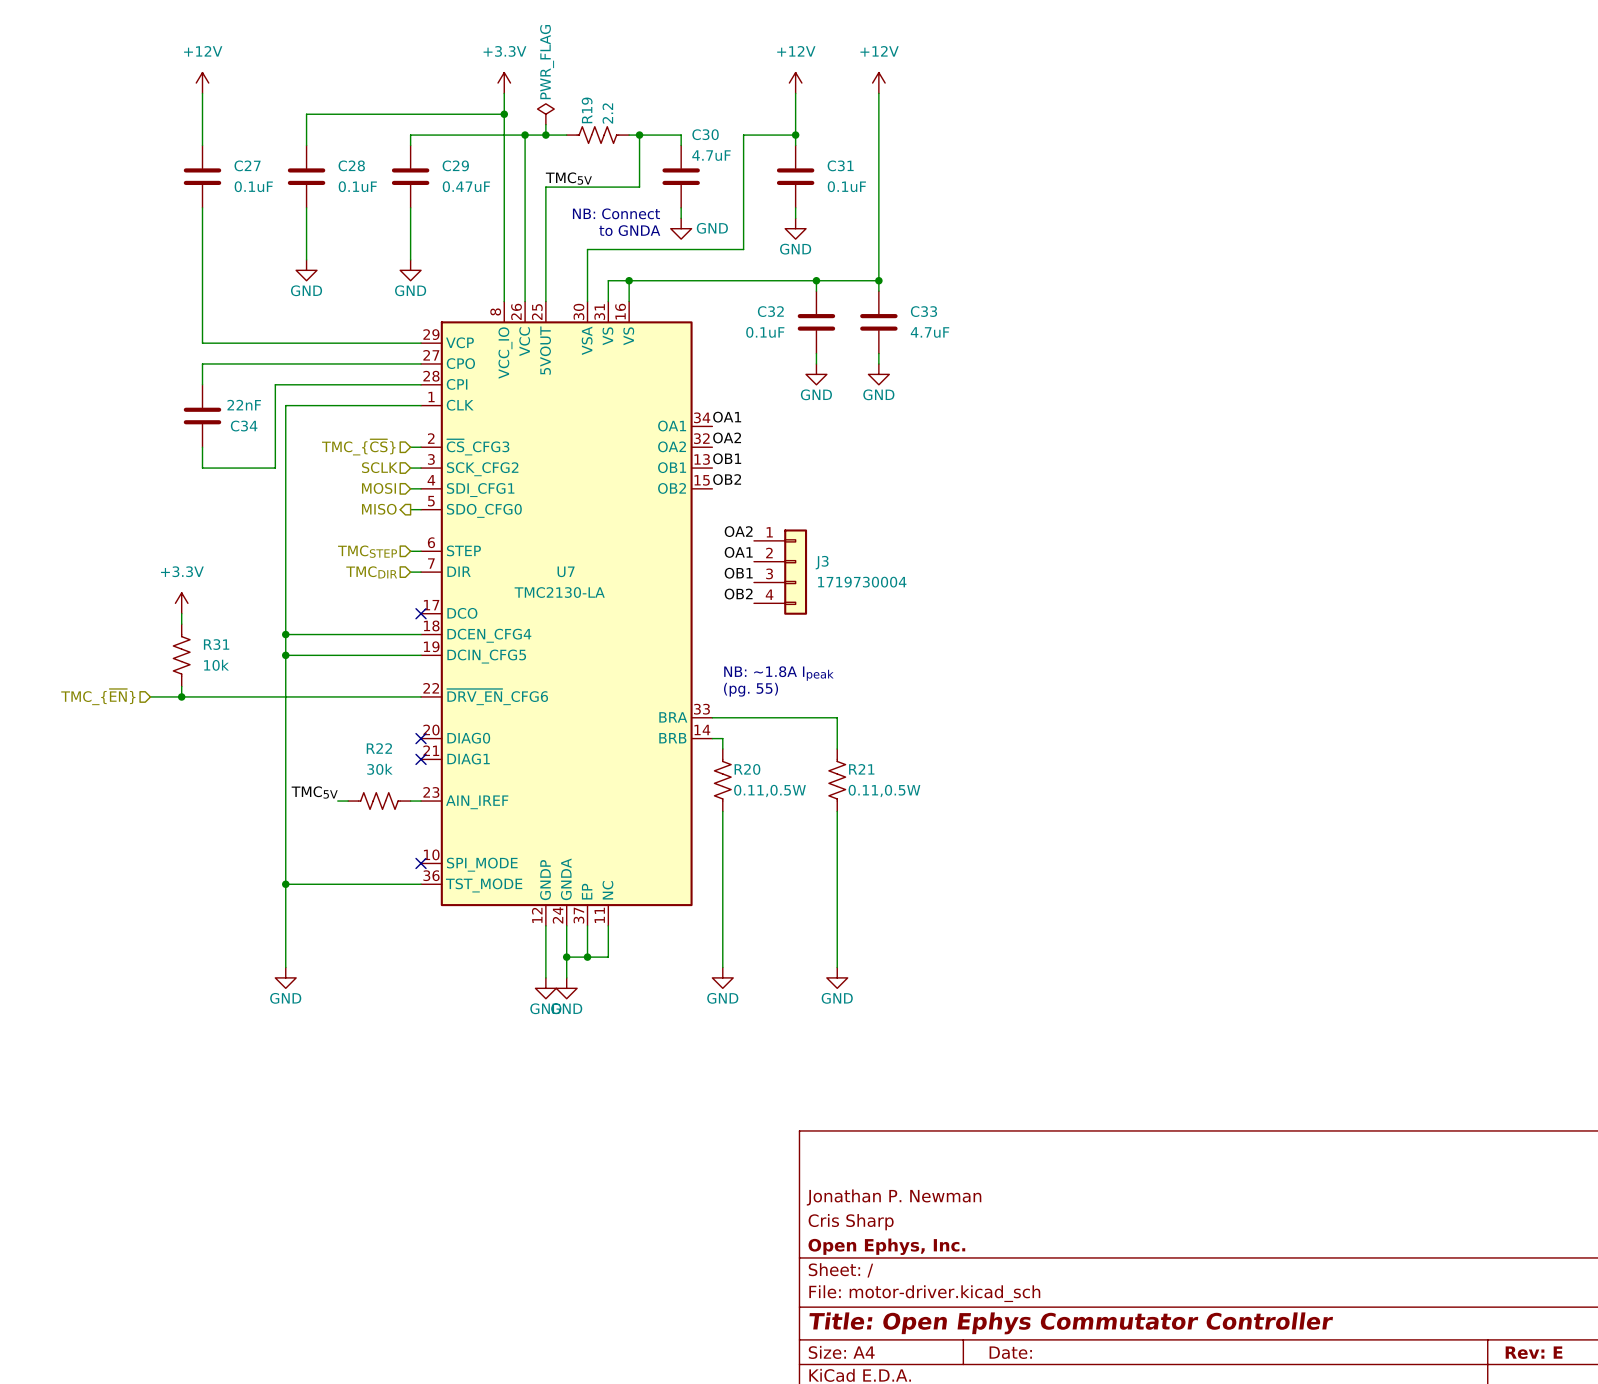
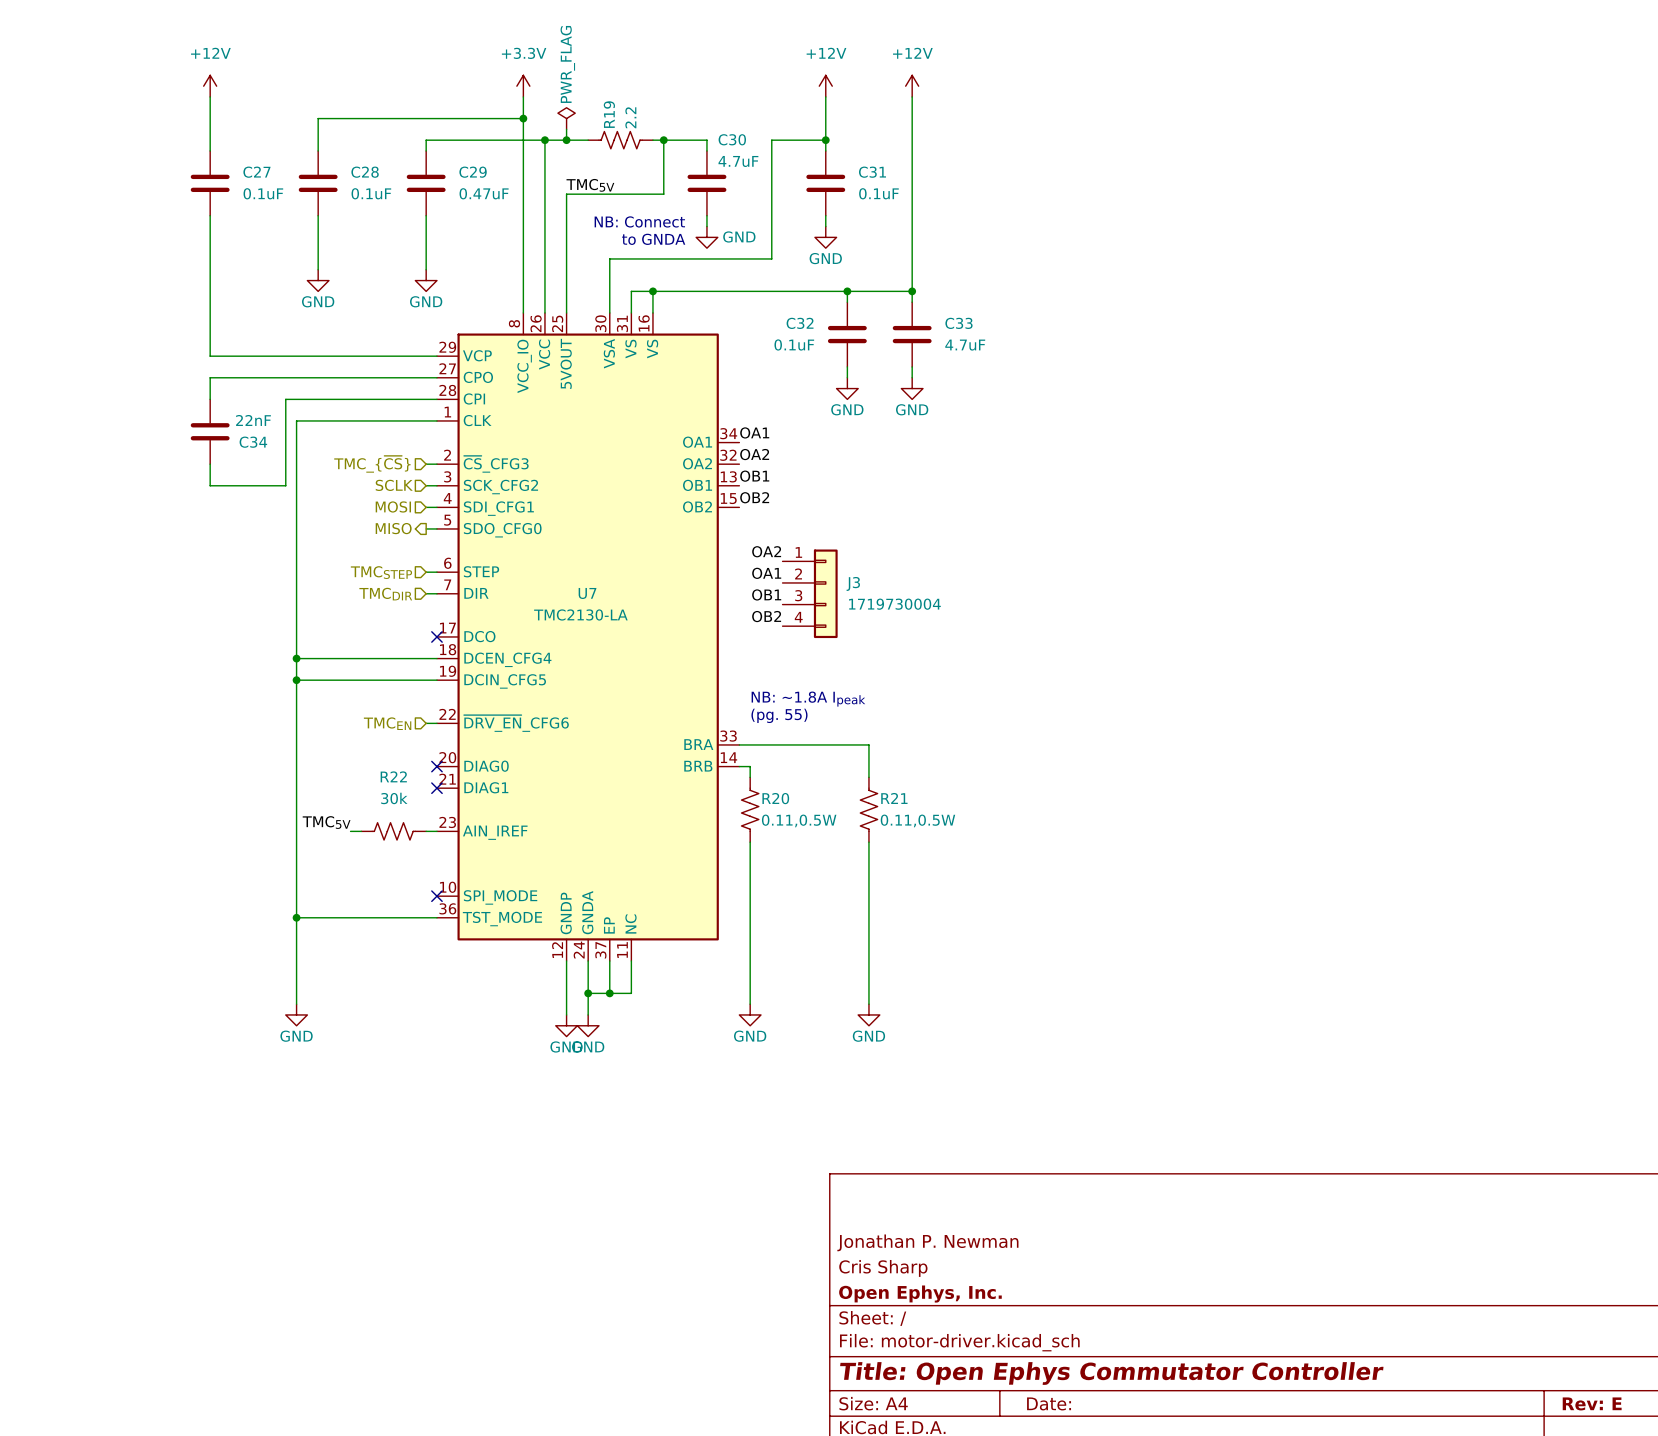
power symbol: +3.3V (181, 603) -> none
wire: (181, 613) (181, 624) -> none
R31: 10k (181, 655) -> none
wire: (181, 686) (181, 696) -> none
wire: (150, 696) (410, 696) -> none
junction: (181, 696) -> none
hierarchical label: TMC_{~{EN}} (98, 697) -> none
hierarchical label: none -> TMCEN (387, 723)

